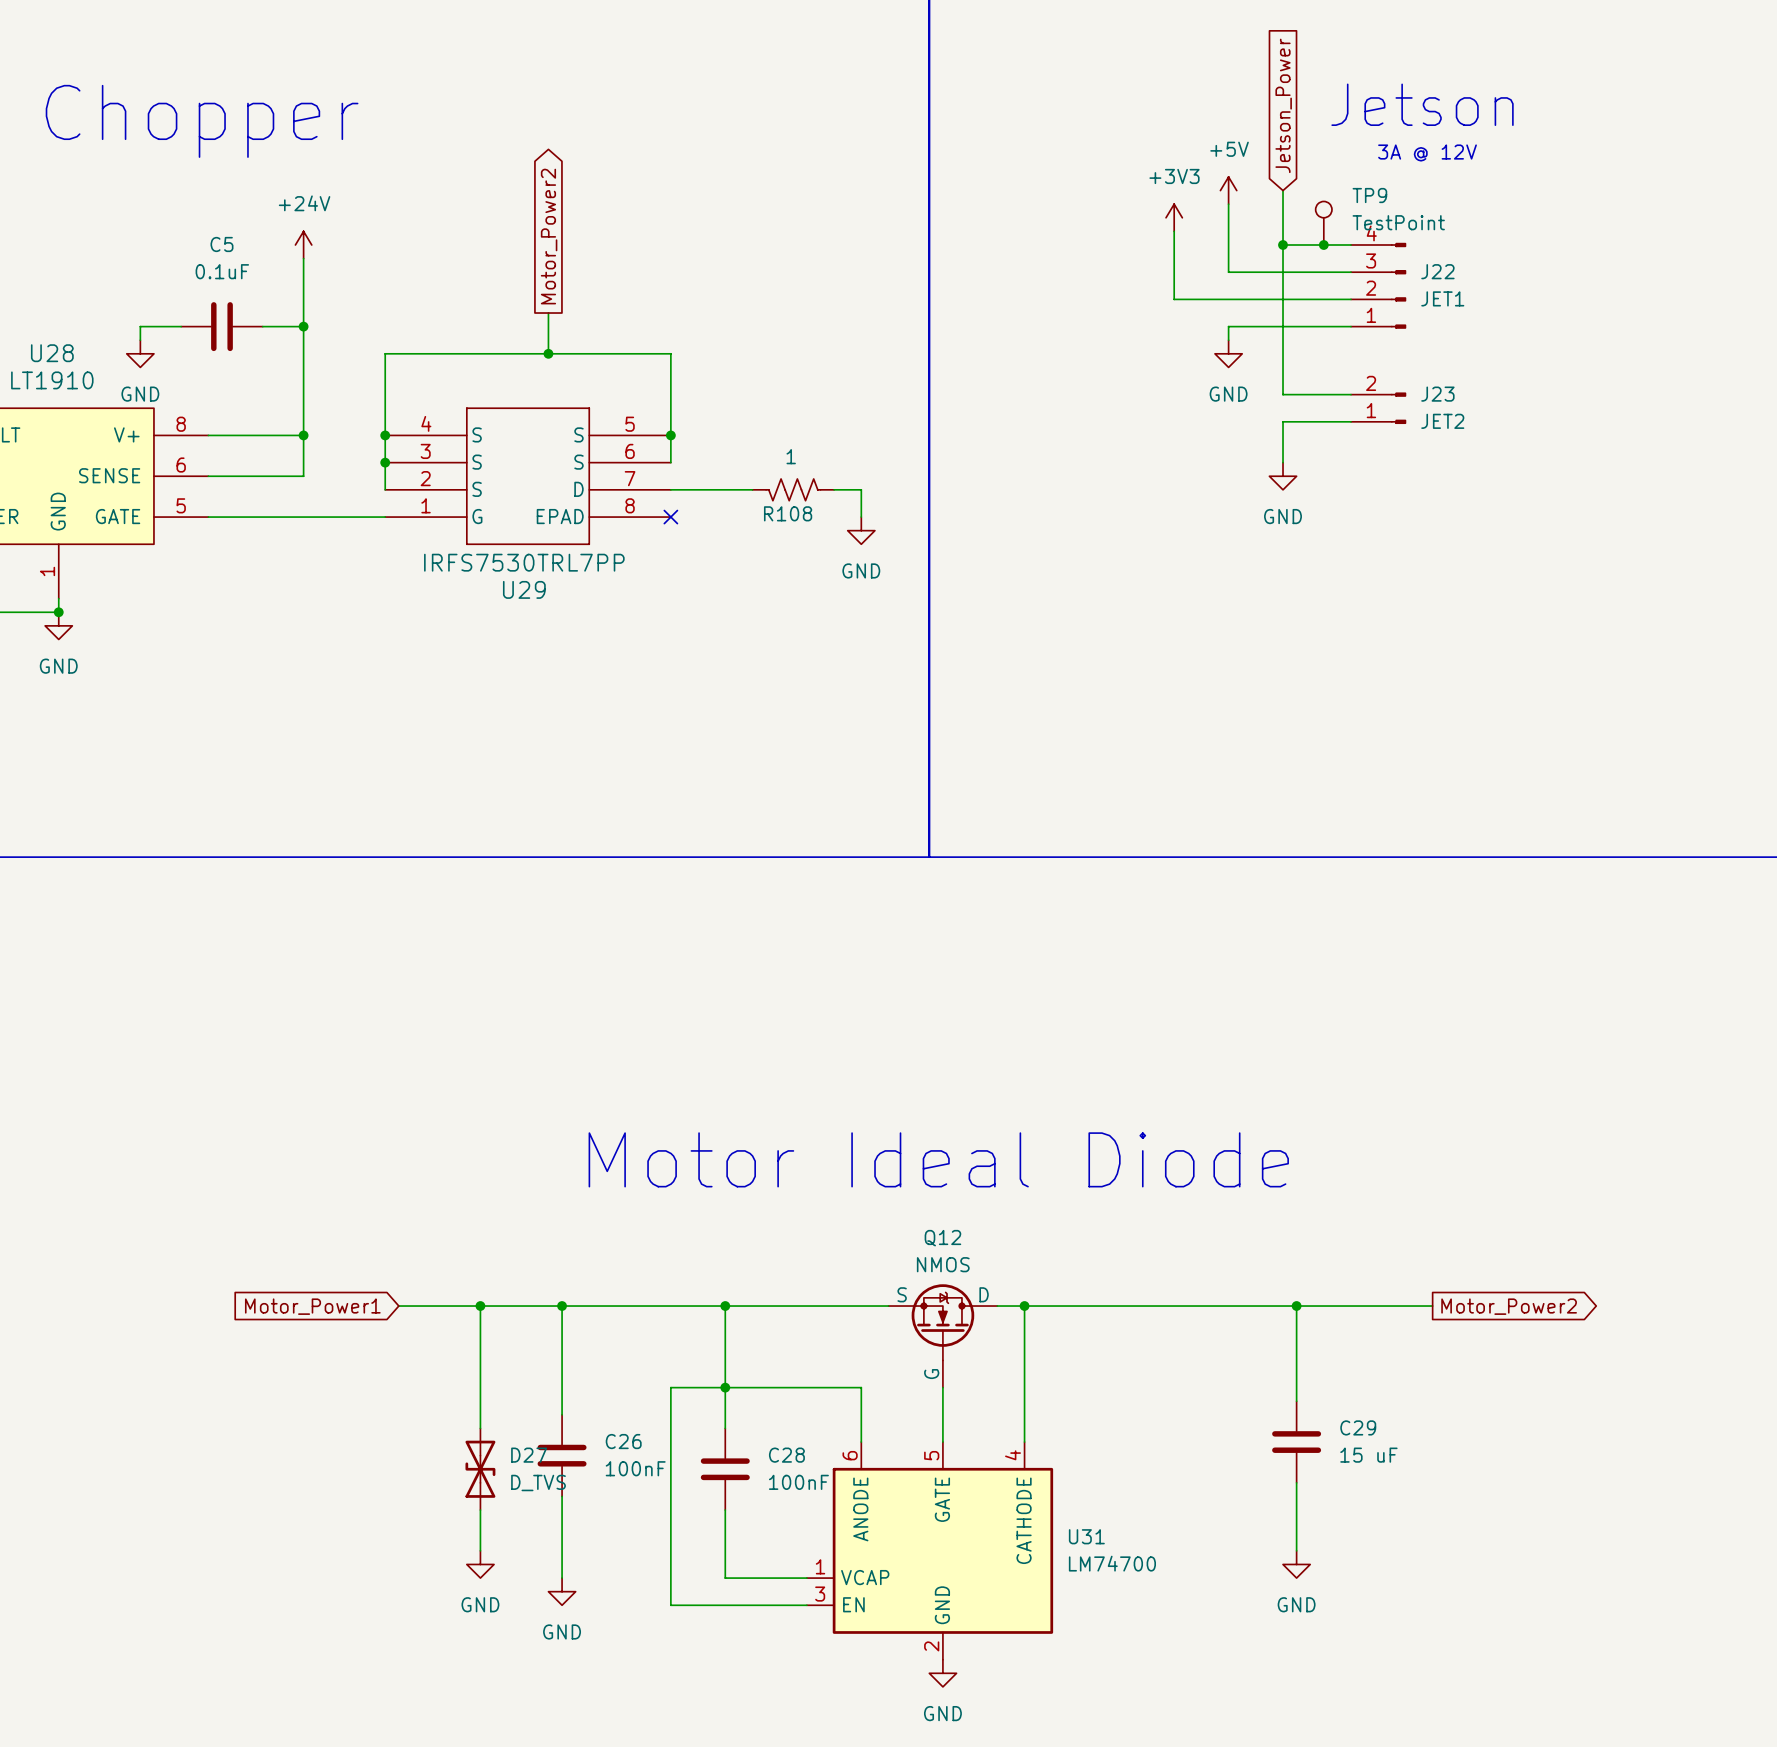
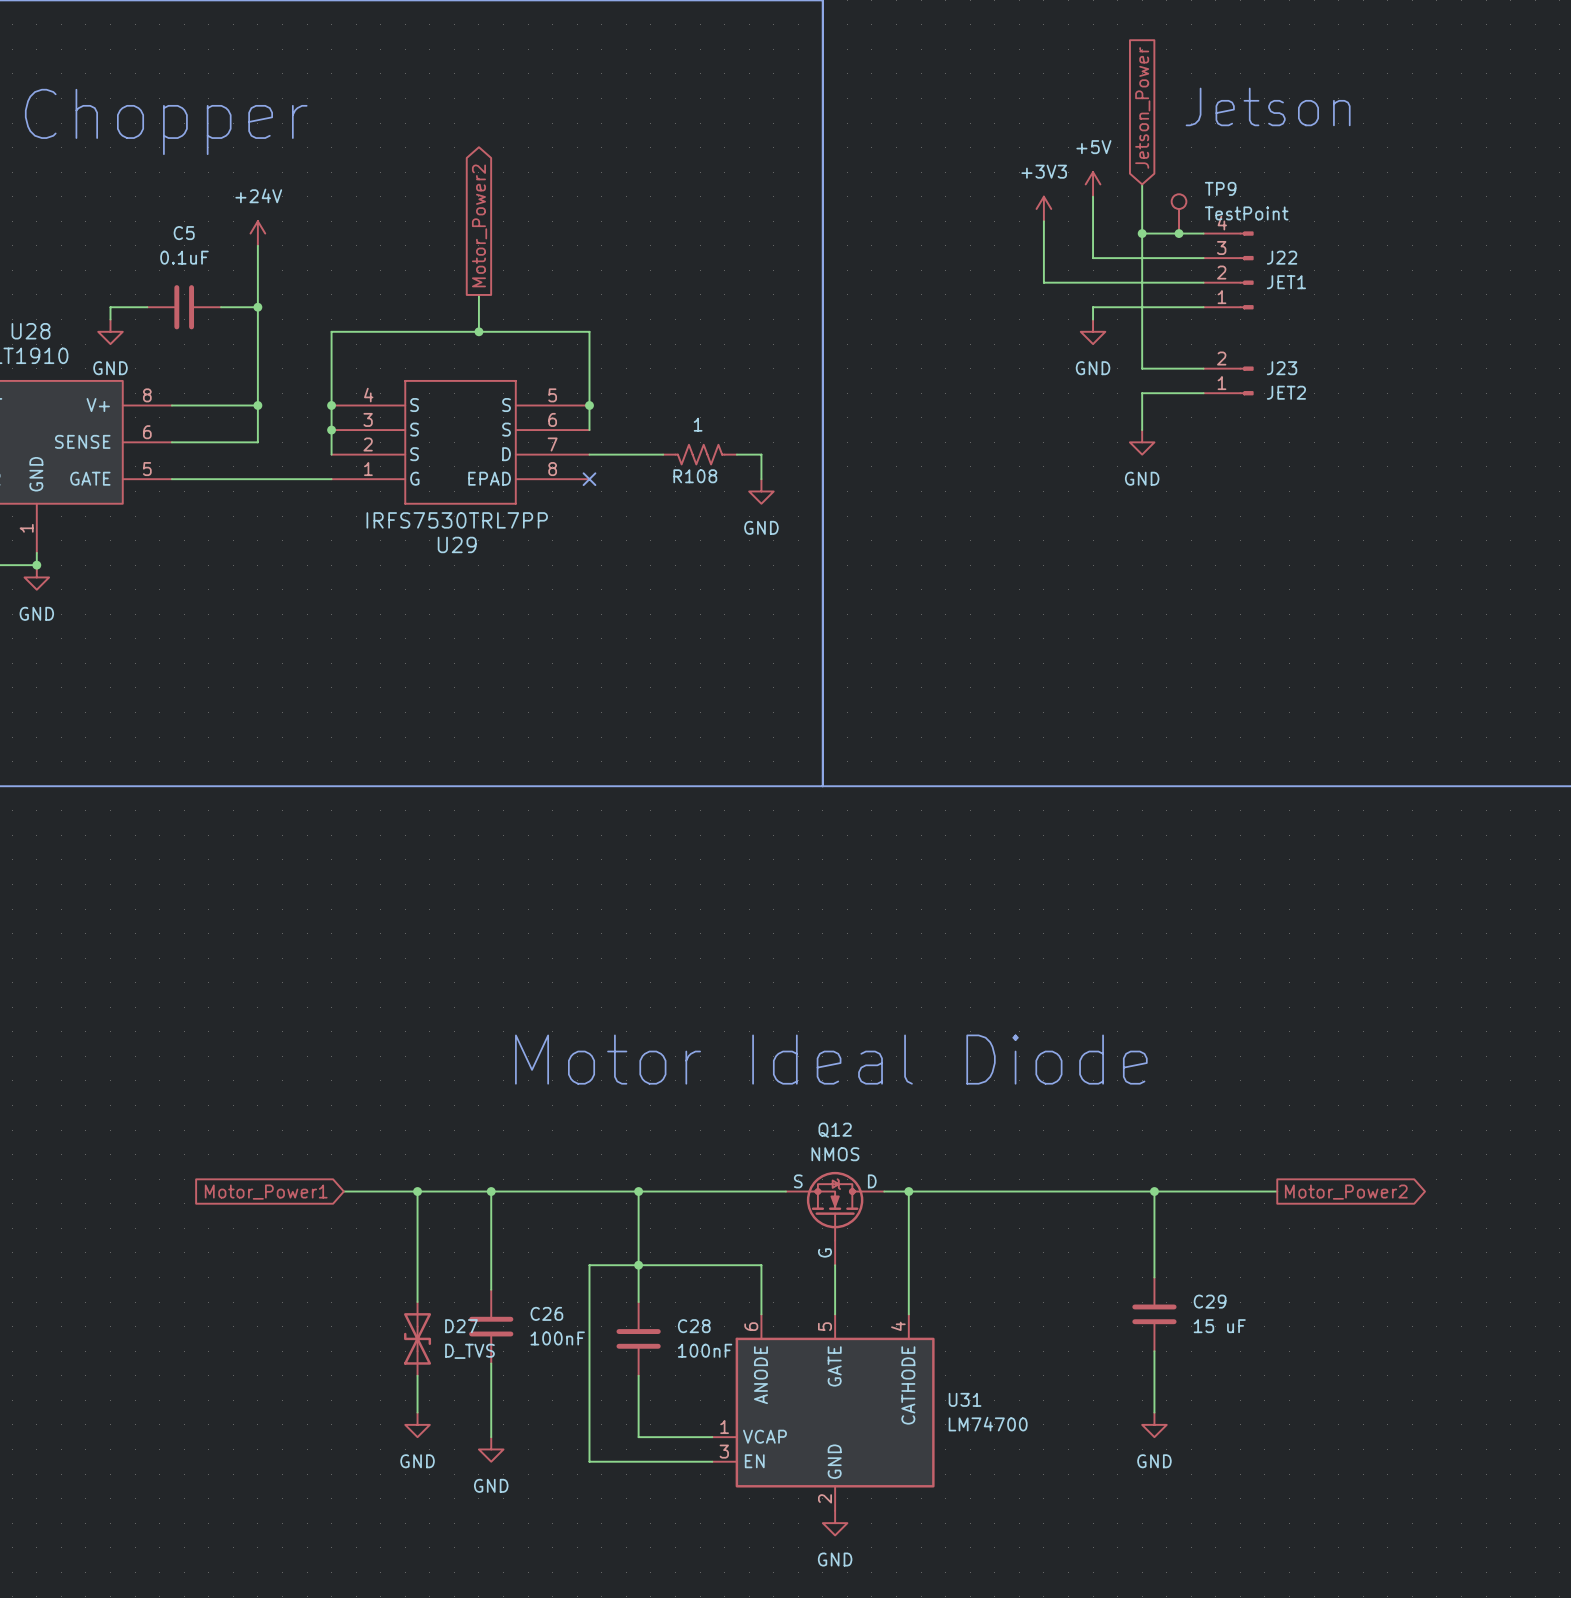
text: 3A @ 12V (1427, 153) -> none

